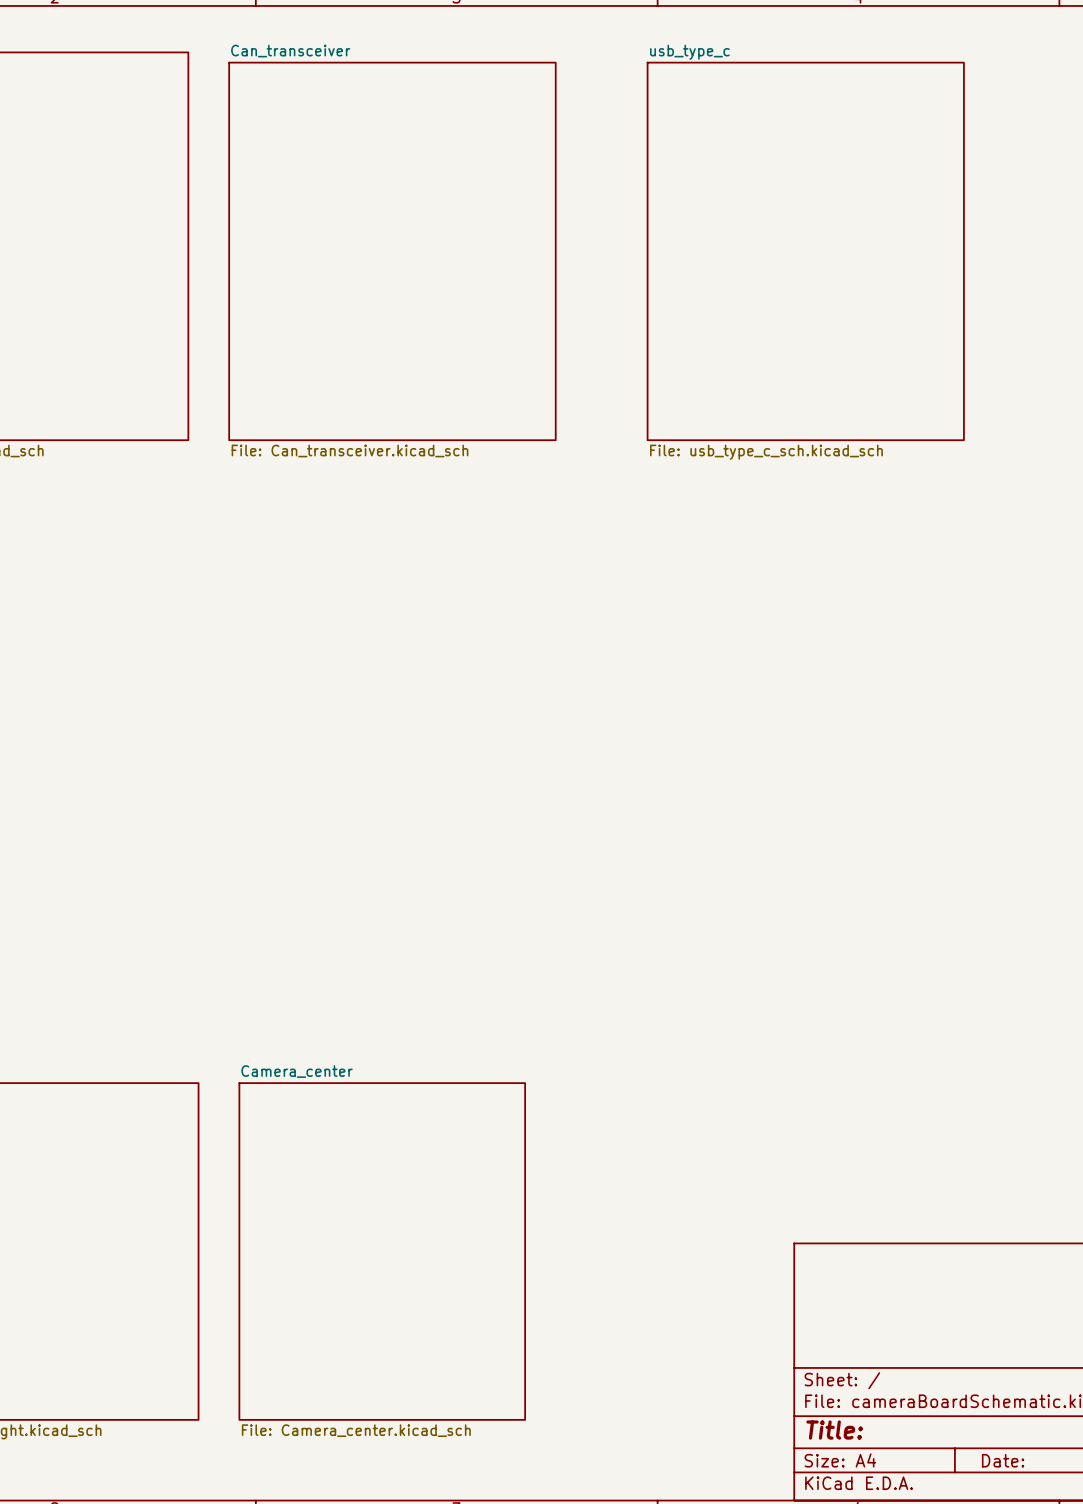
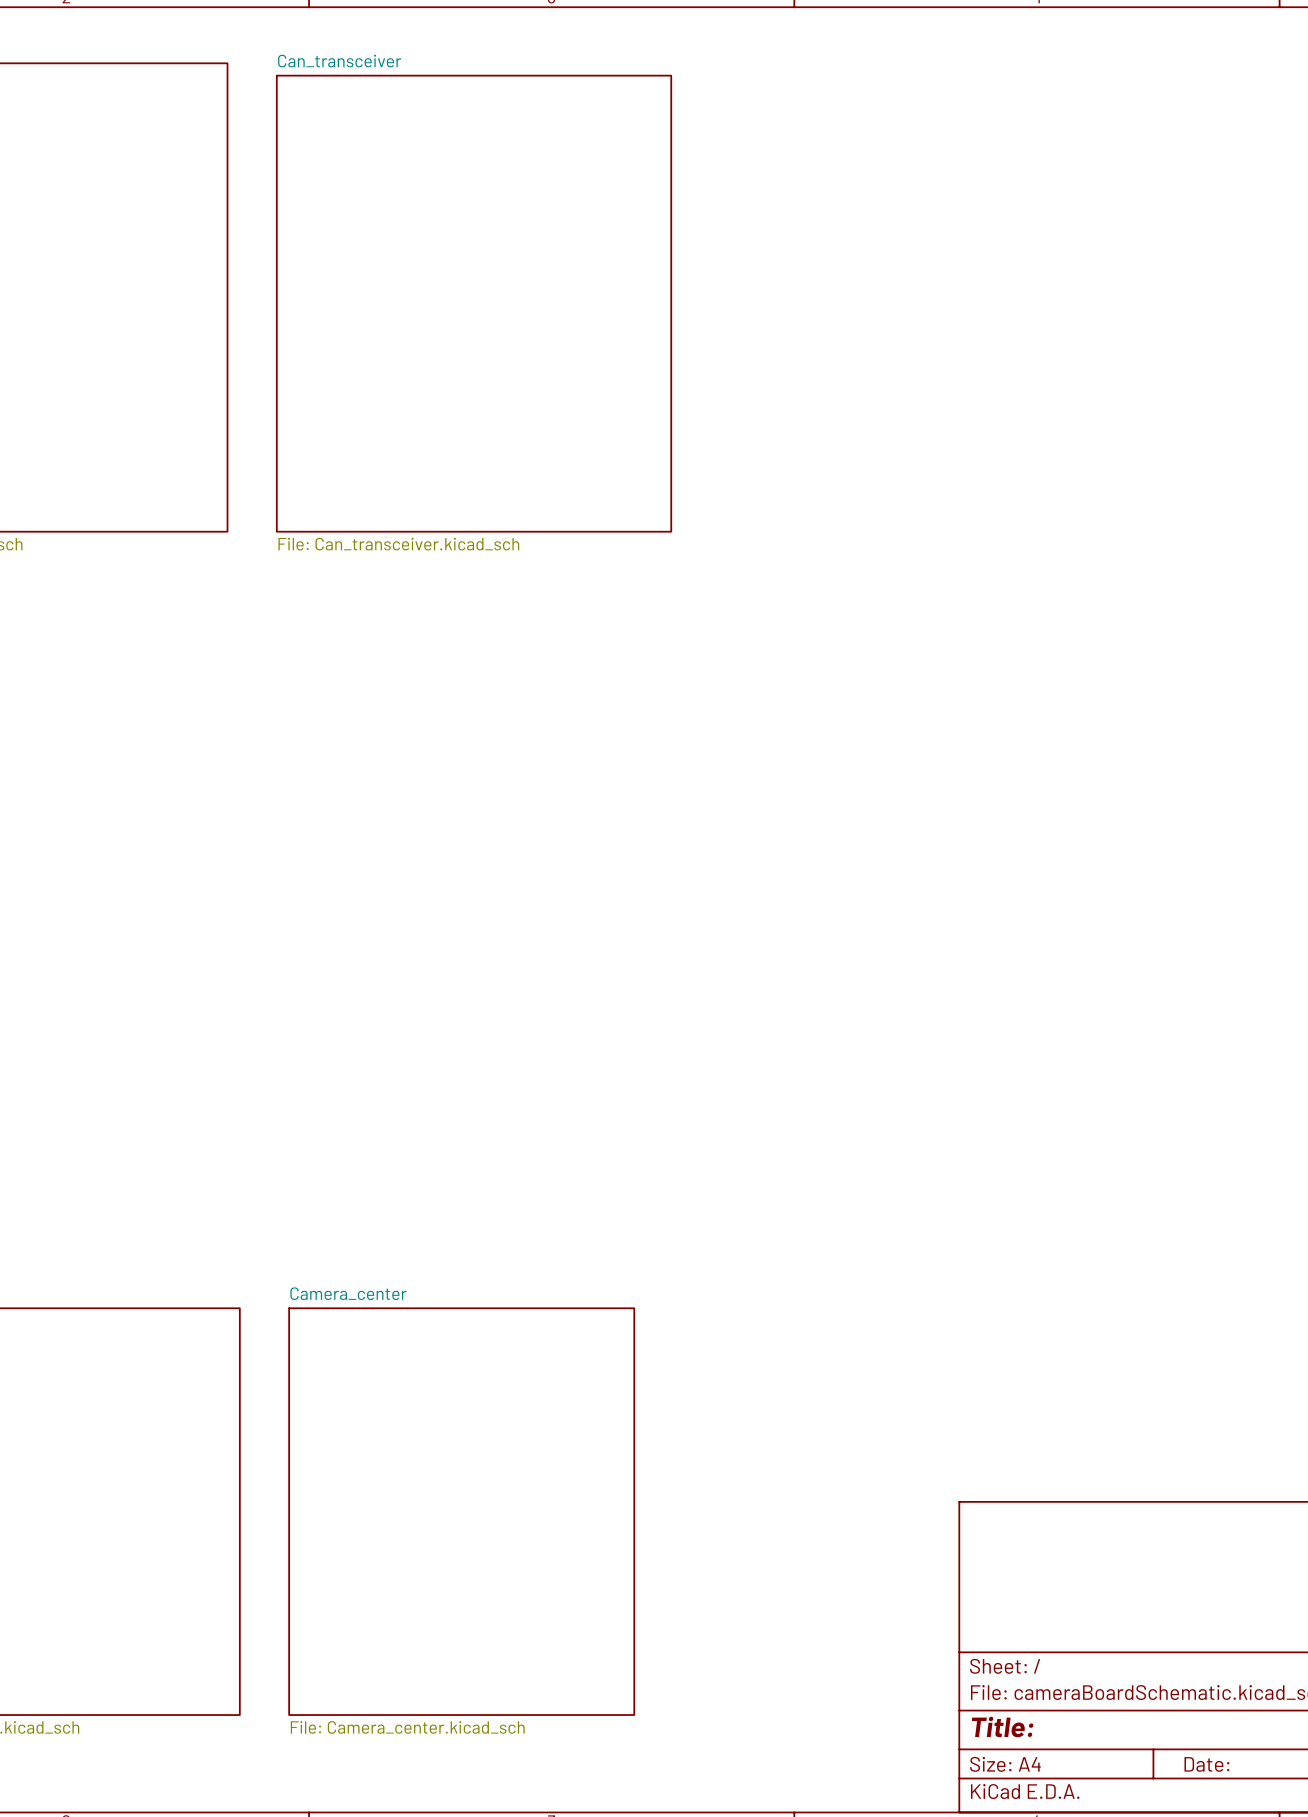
sheet usb_type_c: File: usb_type_c_sch.kicad_sch (805, 251) -> none

